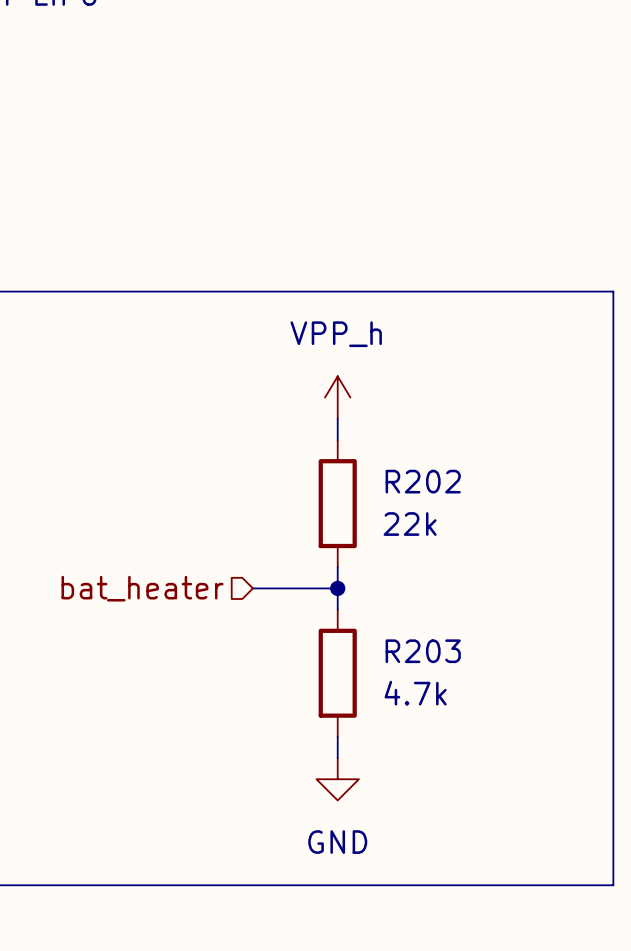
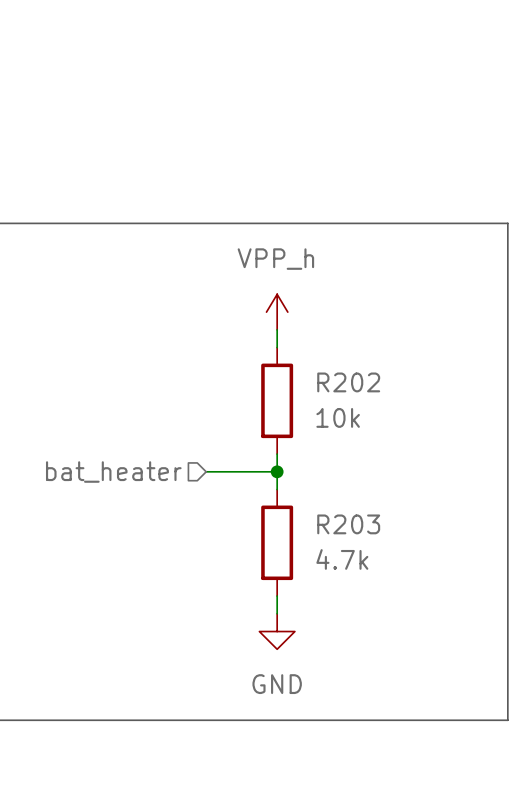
R202 value: 22k (410, 524) -> 10k (338, 417)

